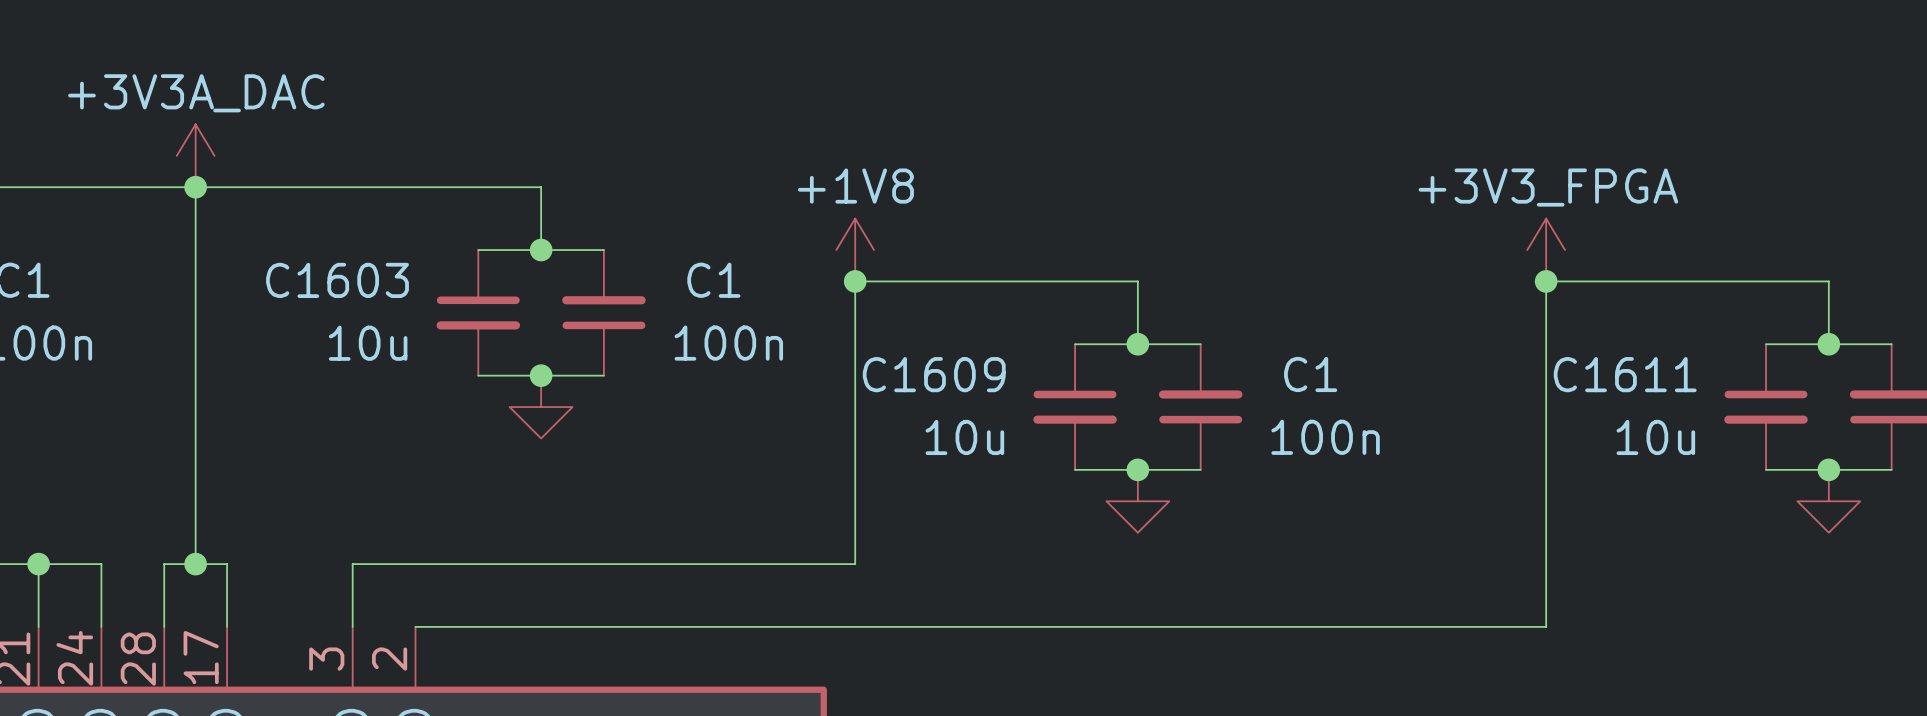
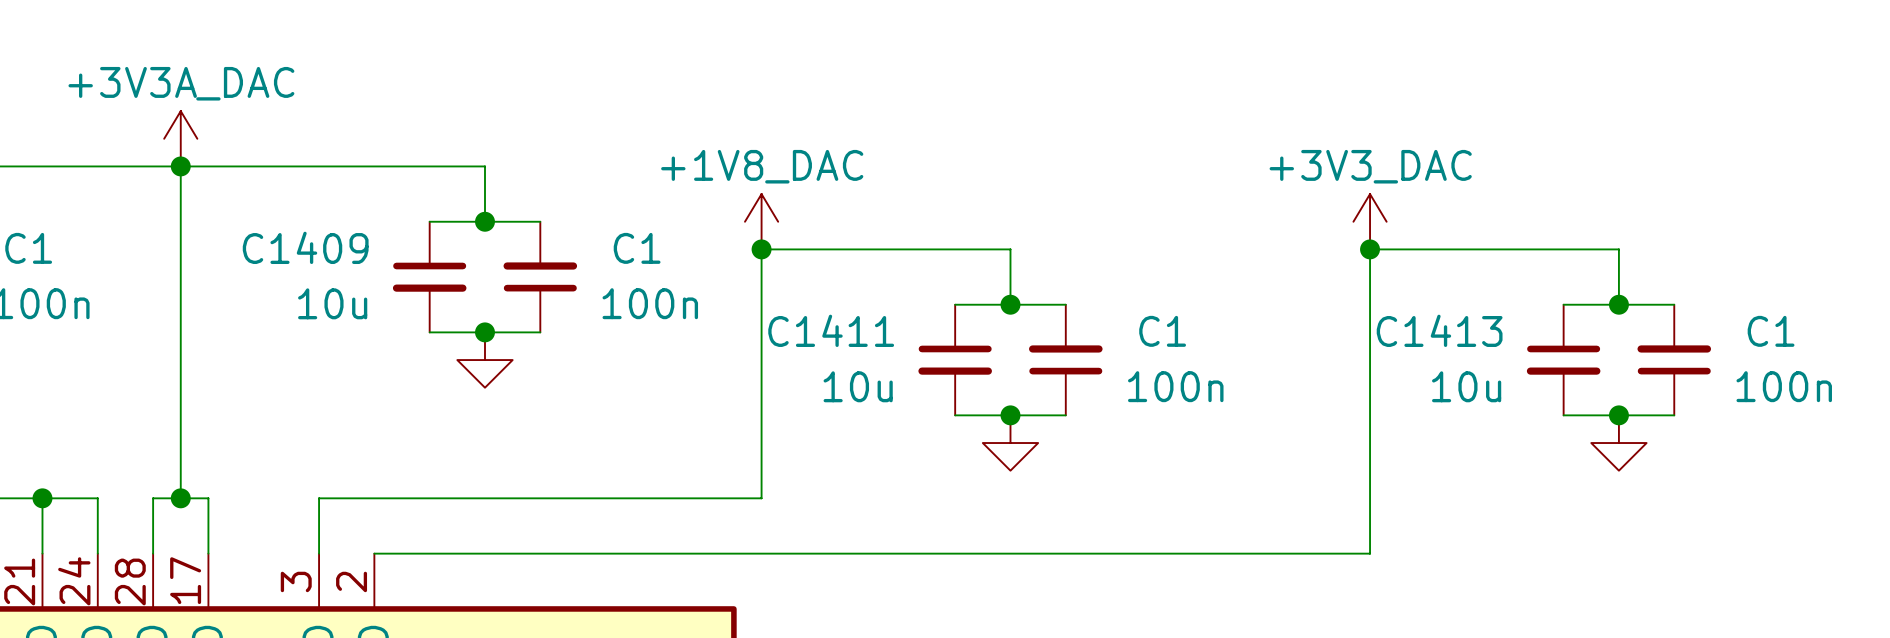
power symbol: +1V8 (855, 250) -> +1V8_DAC (761, 221)
power symbol: +3V3_FPGA (1546, 250) -> +3V3_DAC (1370, 221)
C1603 name: C1603 (337, 280) -> C1409 (305, 247)
C1609 name: C1609 (934, 374) -> C1411 (831, 330)
C1611 name: C1611 (1625, 374) -> C1413 (1439, 330)

